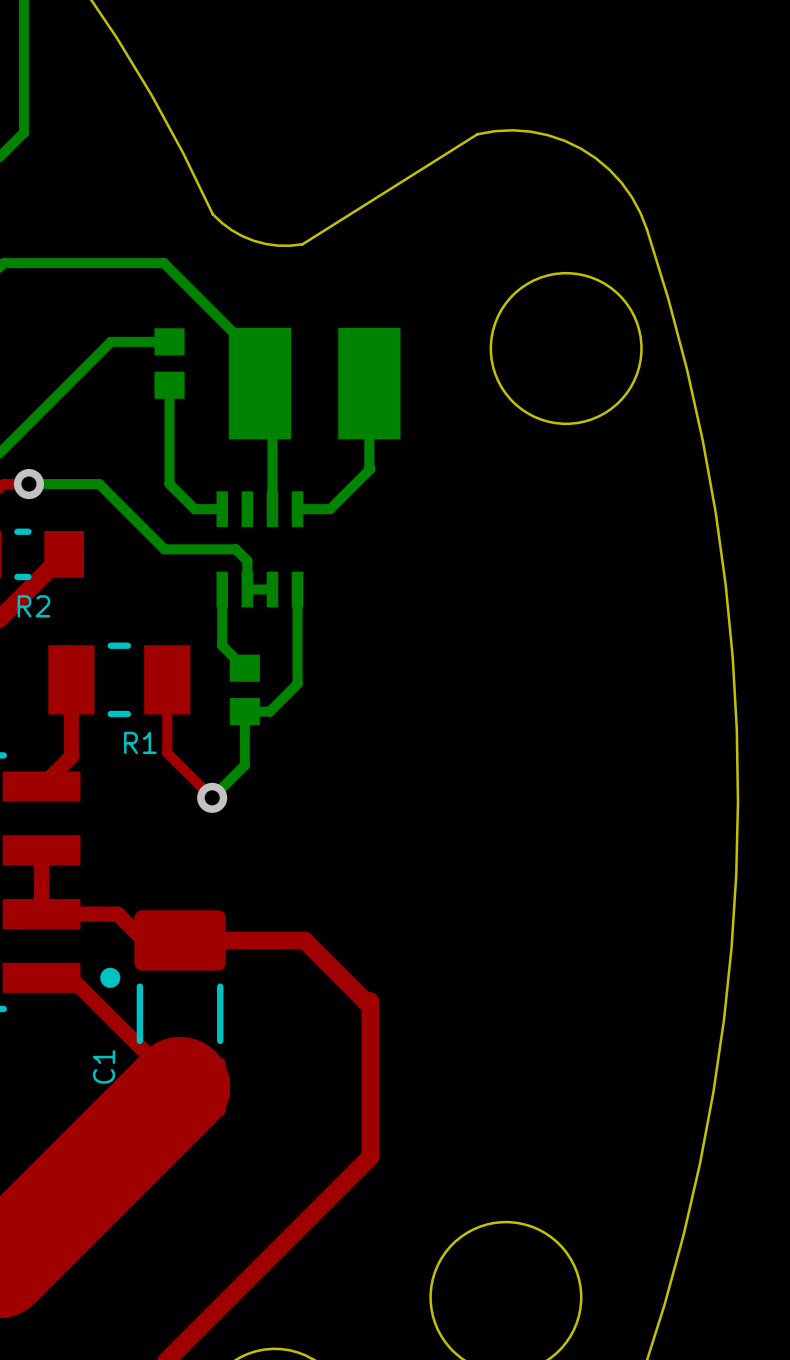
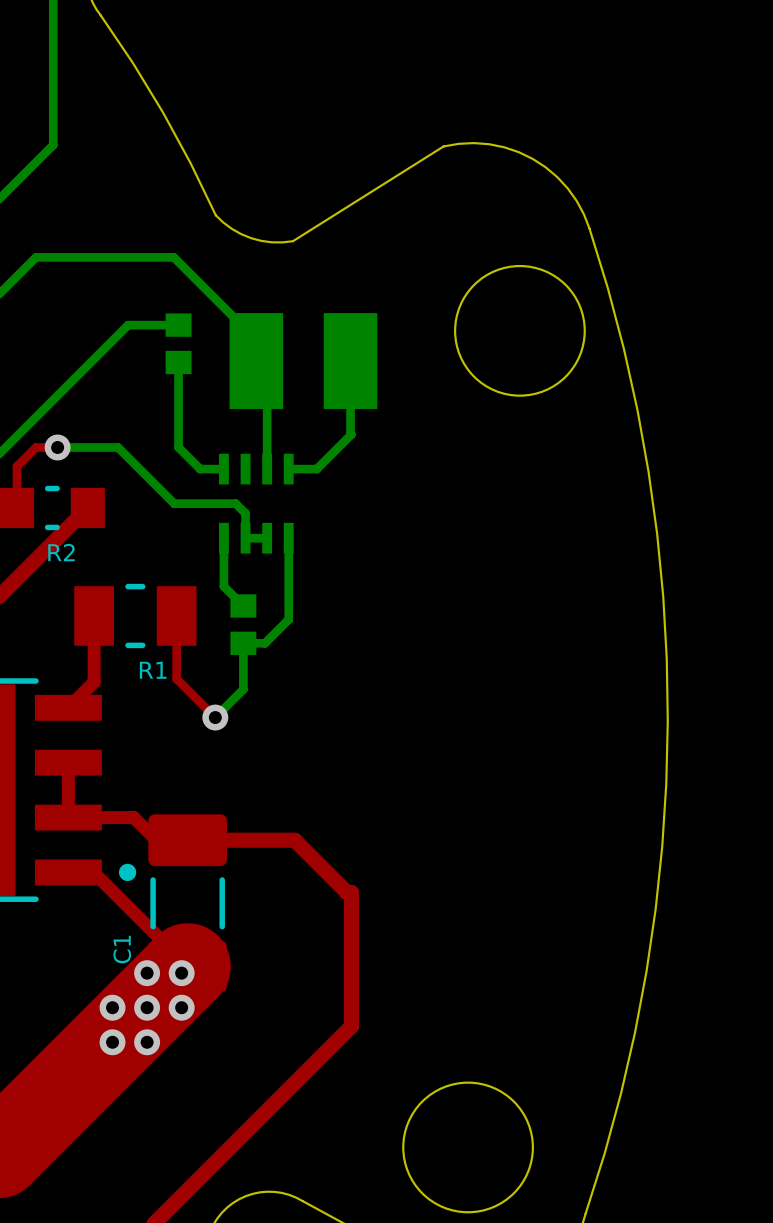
via: none -> (147, 973)
via: none -> (181, 973)
via: none -> (112, 1007)
via: none -> (147, 1007)
via: none -> (181, 1007)
via: none -> (112, 1042)
via: none -> (147, 1042)

